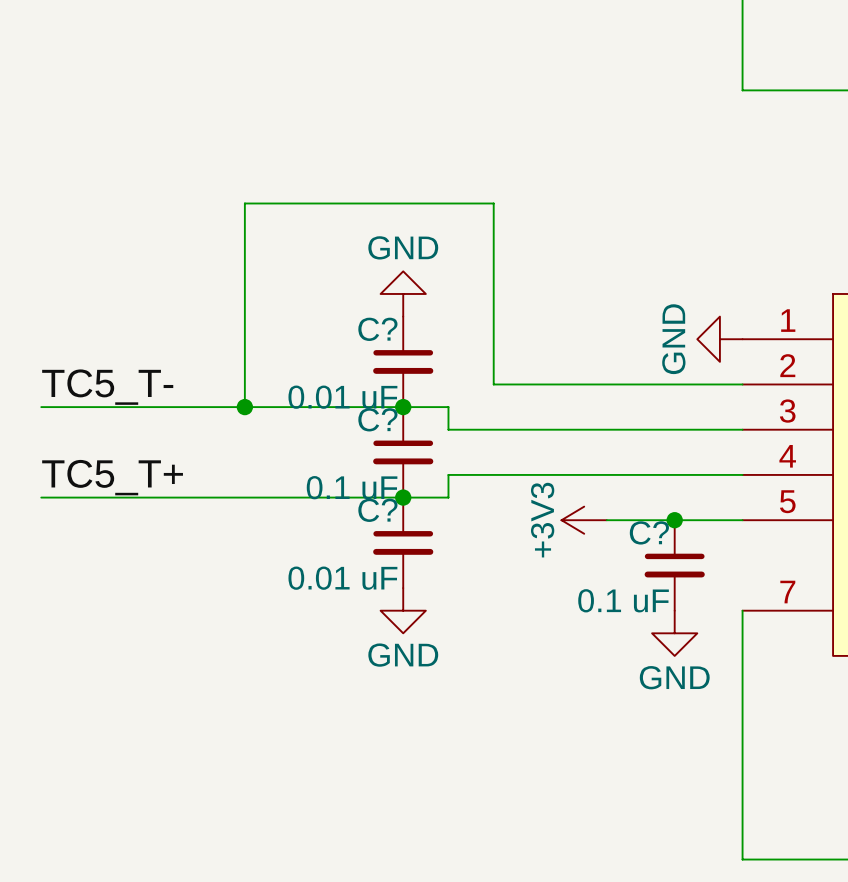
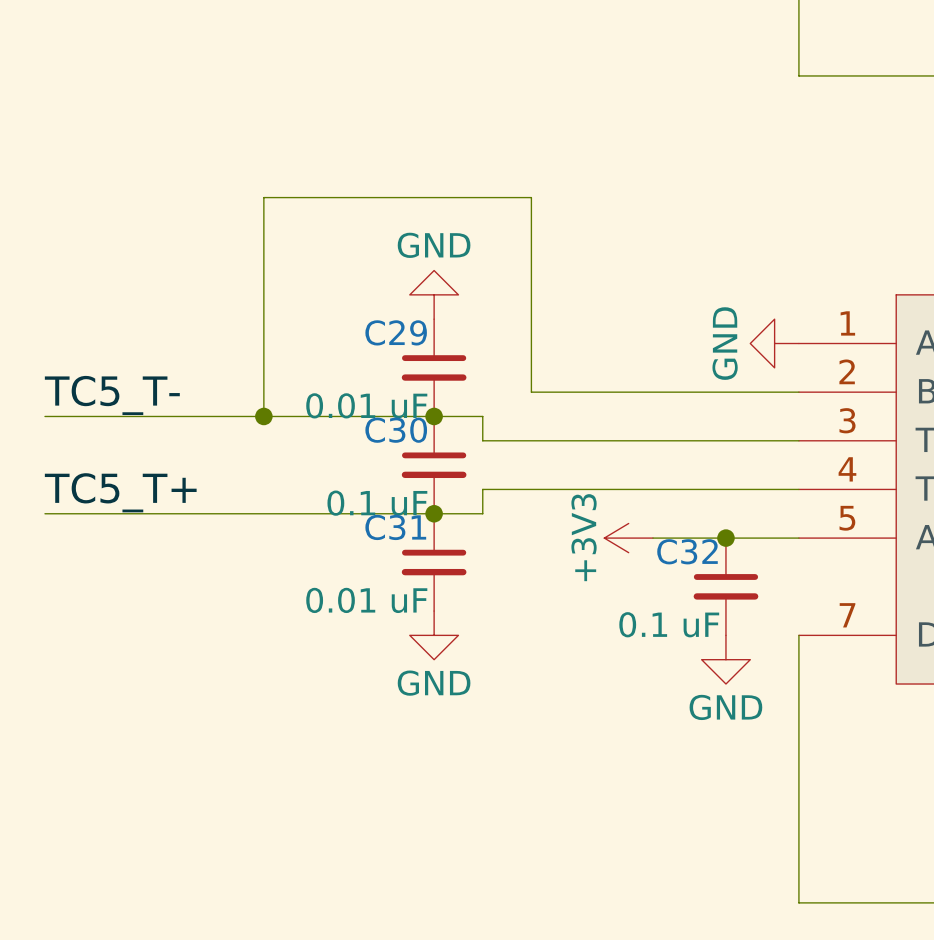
C? name: C? (377, 329) -> C29 (396, 332)
C? name: C? (377, 419) -> C30 (396, 430)
C? name: C? (377, 510) -> C31 (395, 527)
C? name: C? (649, 532) -> C32 (687, 551)

